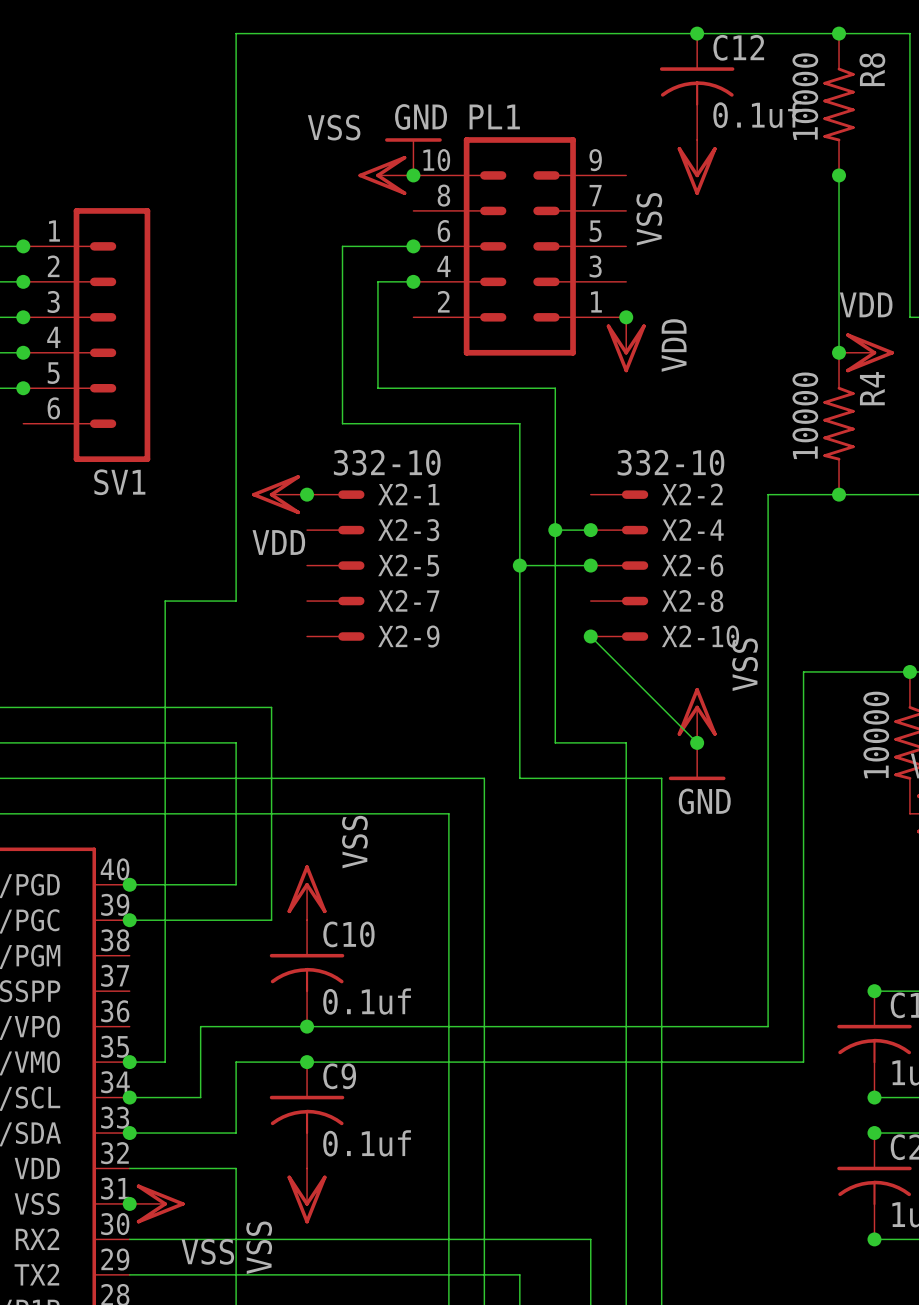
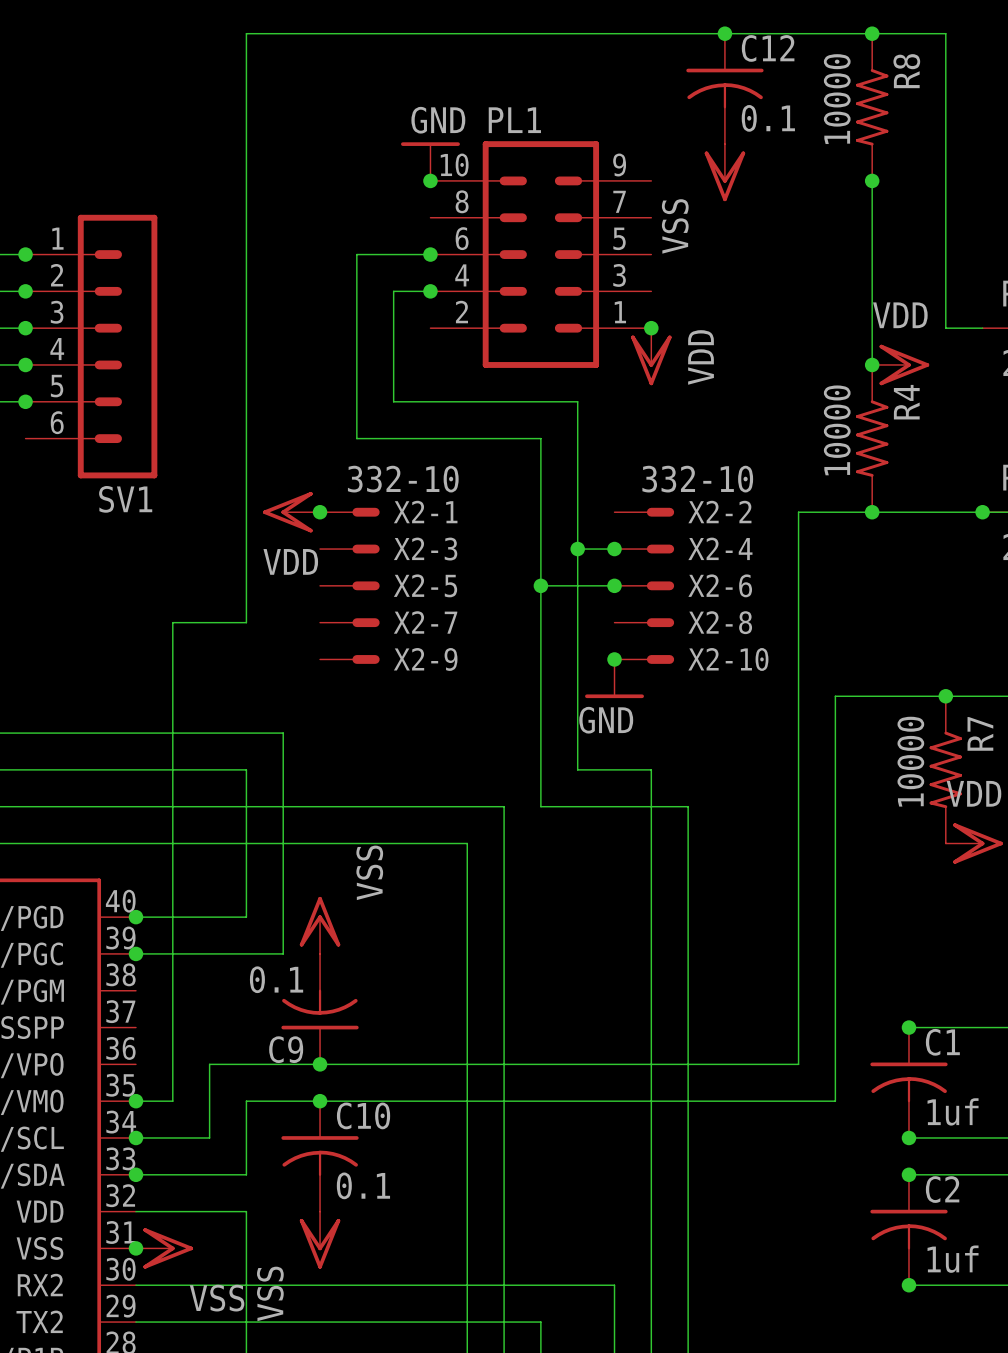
C12 value: 0.1uf (757, 114) -> 0.1 (768, 118)
power symbol: VSS (385, 175) -> none
wire: (590, 636) (697, 742) -> none
power symbol: VSS (697, 715) -> none
junction: (697, 742) -> none
power symbol position: GND (697, 761) -> GND (614, 678)
power symbol text position: GND (704, 801) -> GND (606, 720)
C10: 0.1uf (307, 973) -> none
C9: none -> 0.1 (320, 1009)
C9 name: C9 (339, 1076) -> C10 (363, 1115)
C9 value: 0.1uf (367, 1143) -> 0.1 (363, 1185)

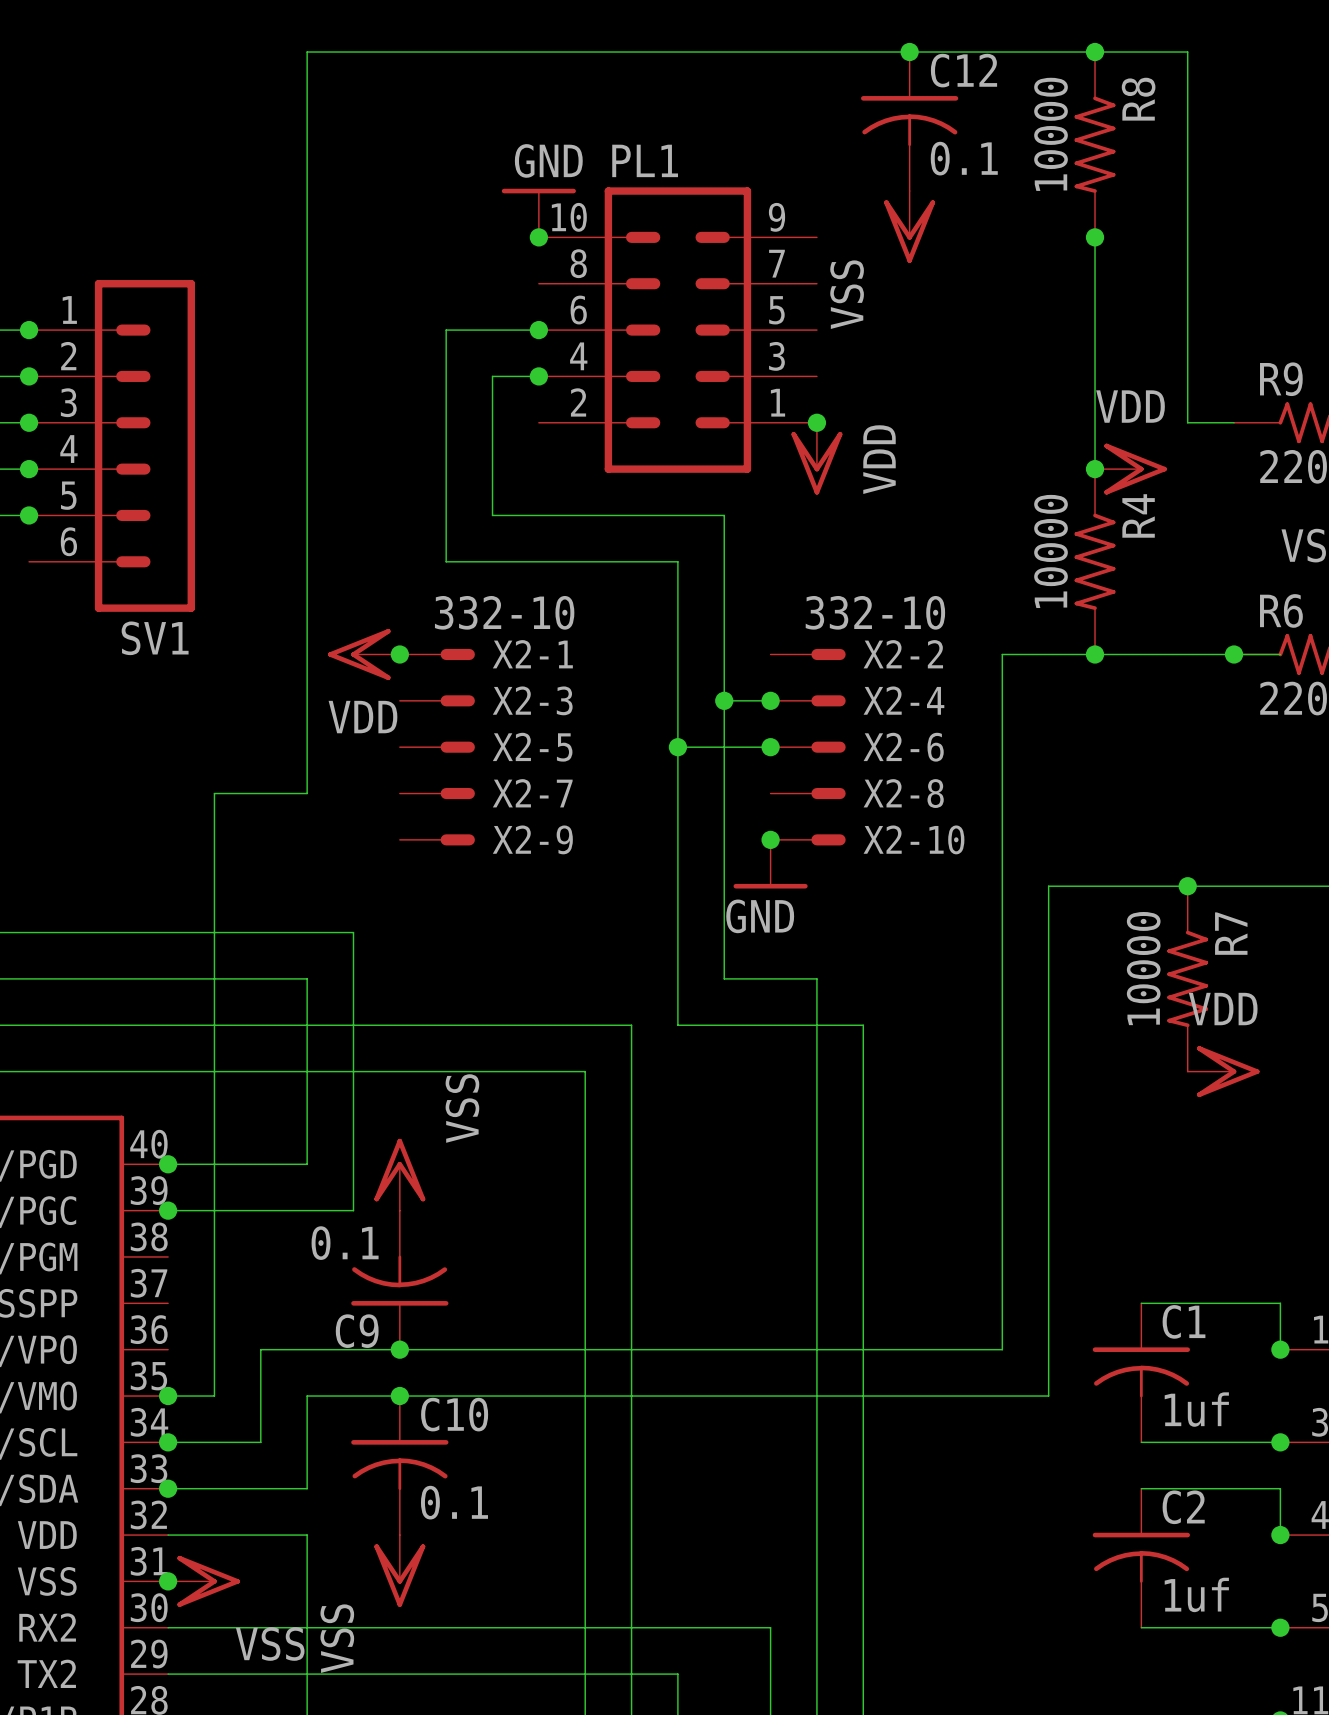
junction: (908, 1027) -> none
junction: (908, 1137) -> none
junction: (908, 1174) -> none
junction: (908, 1285) -> none

